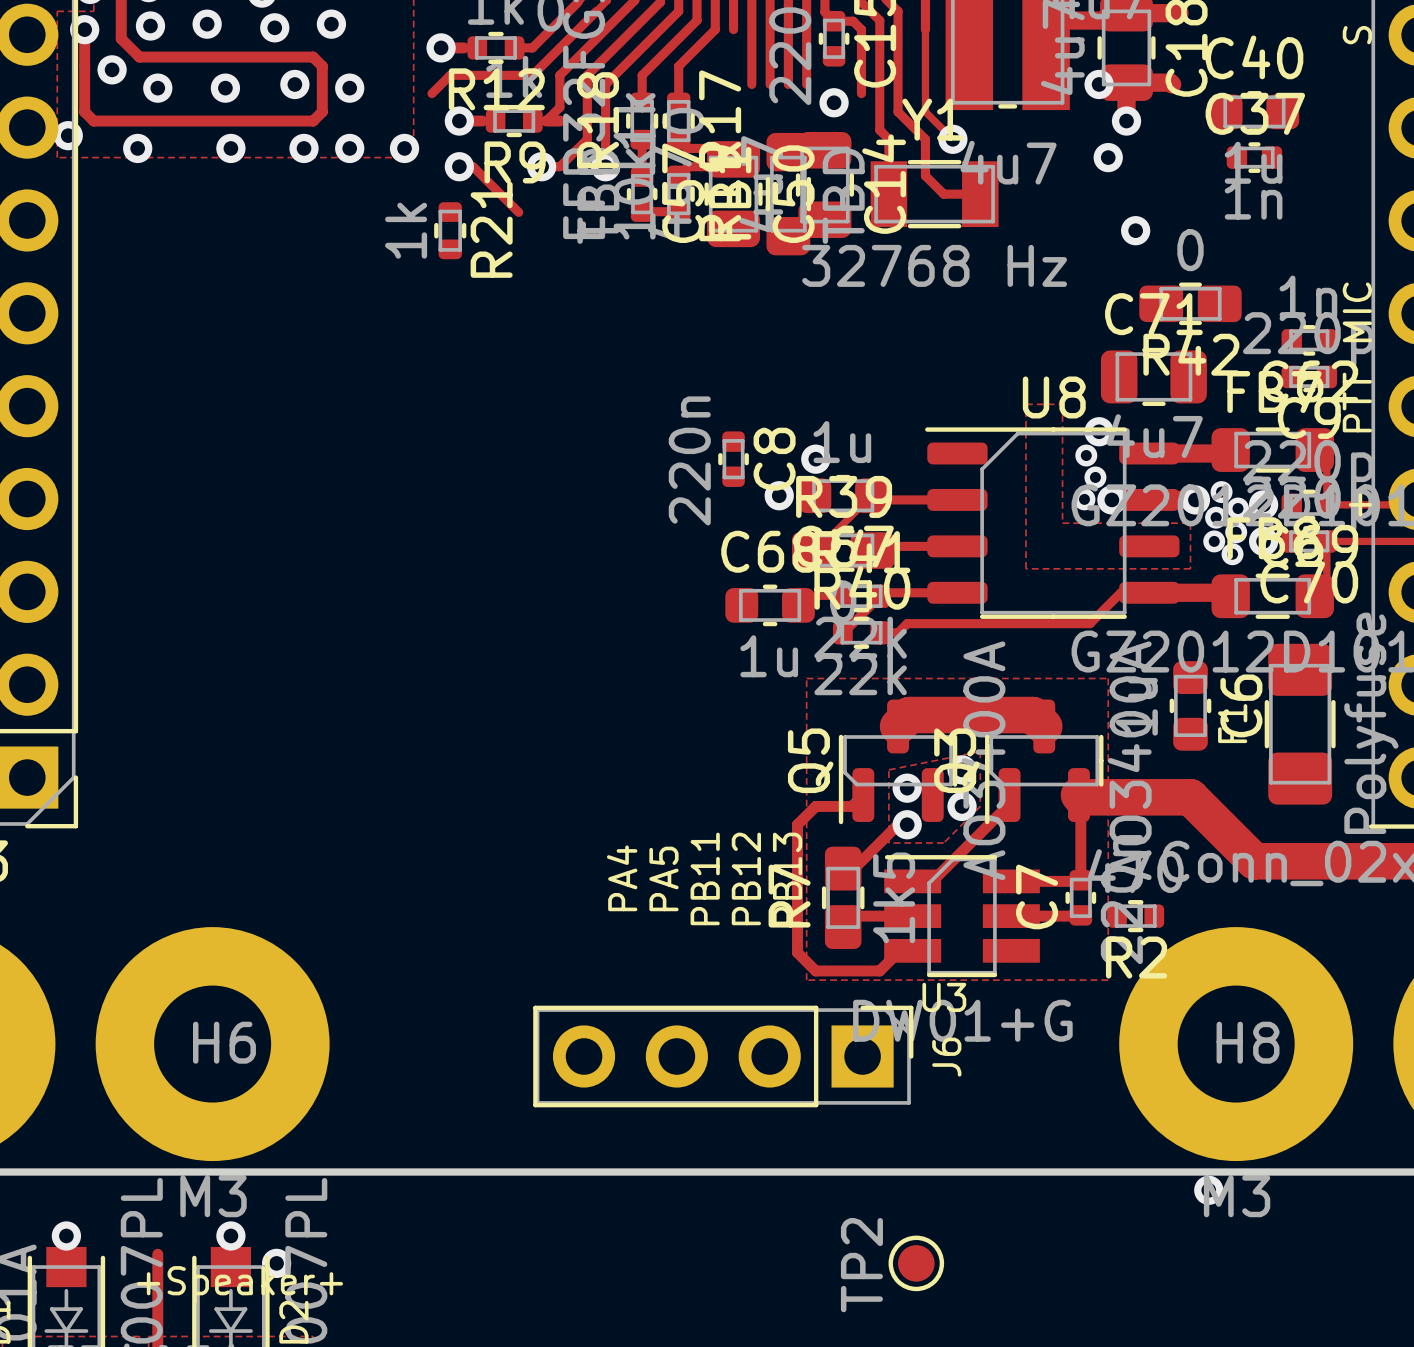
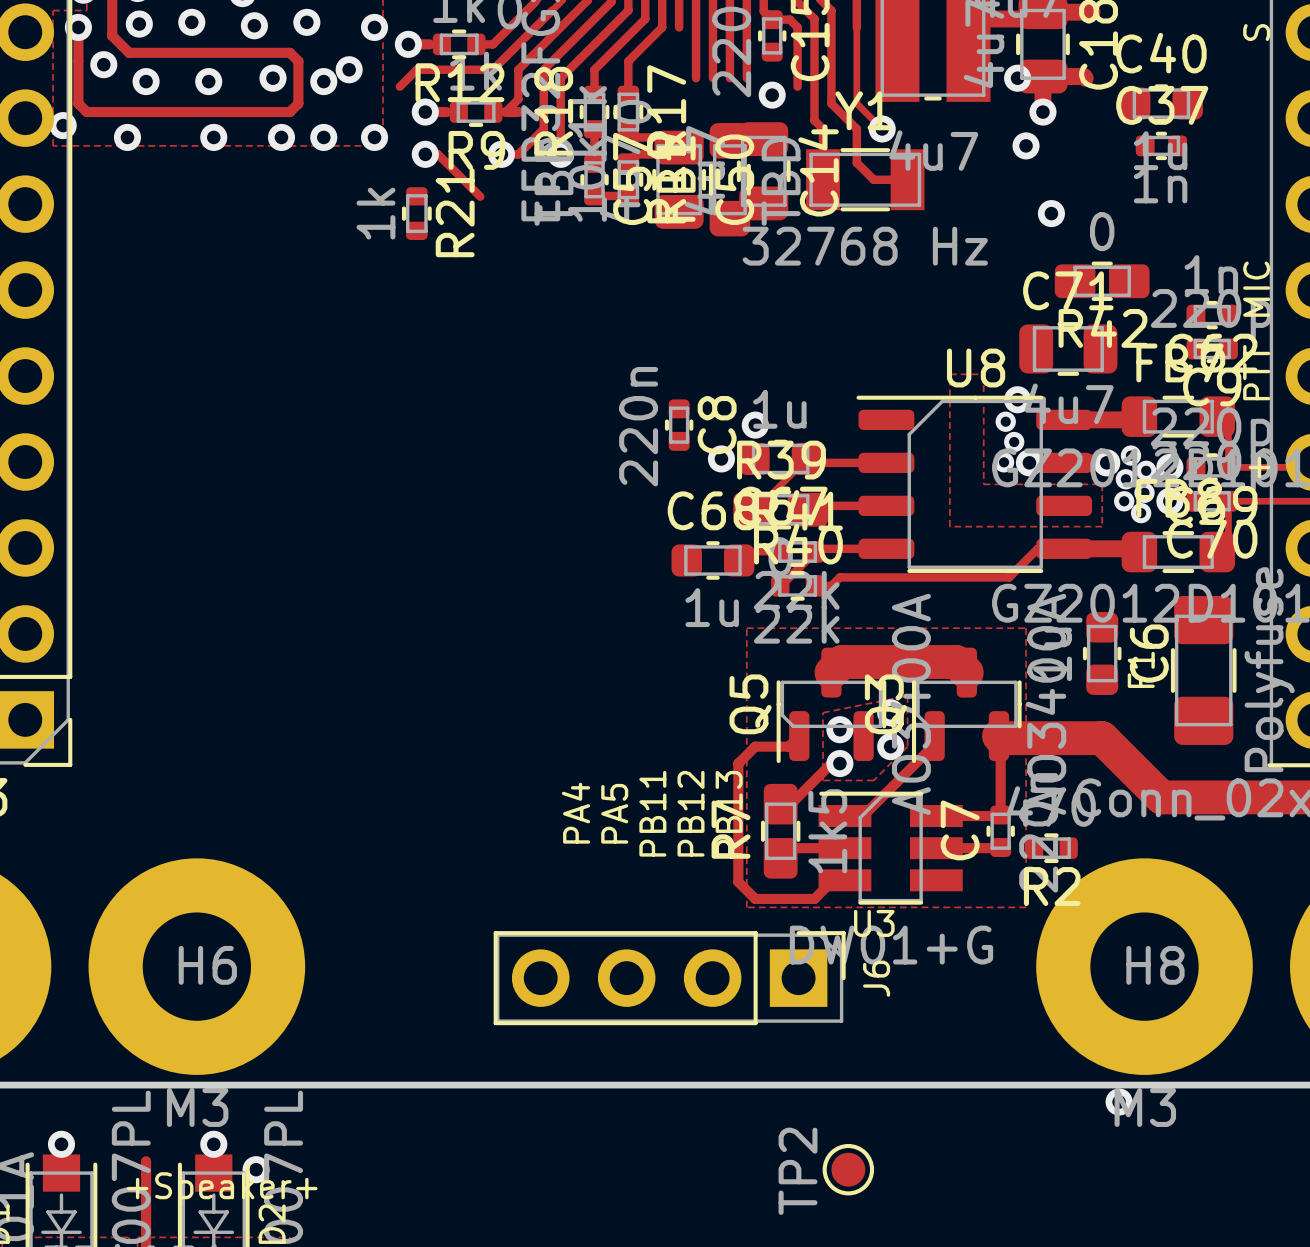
via: none -> (374, 27)
via: none -> (349, 69)

